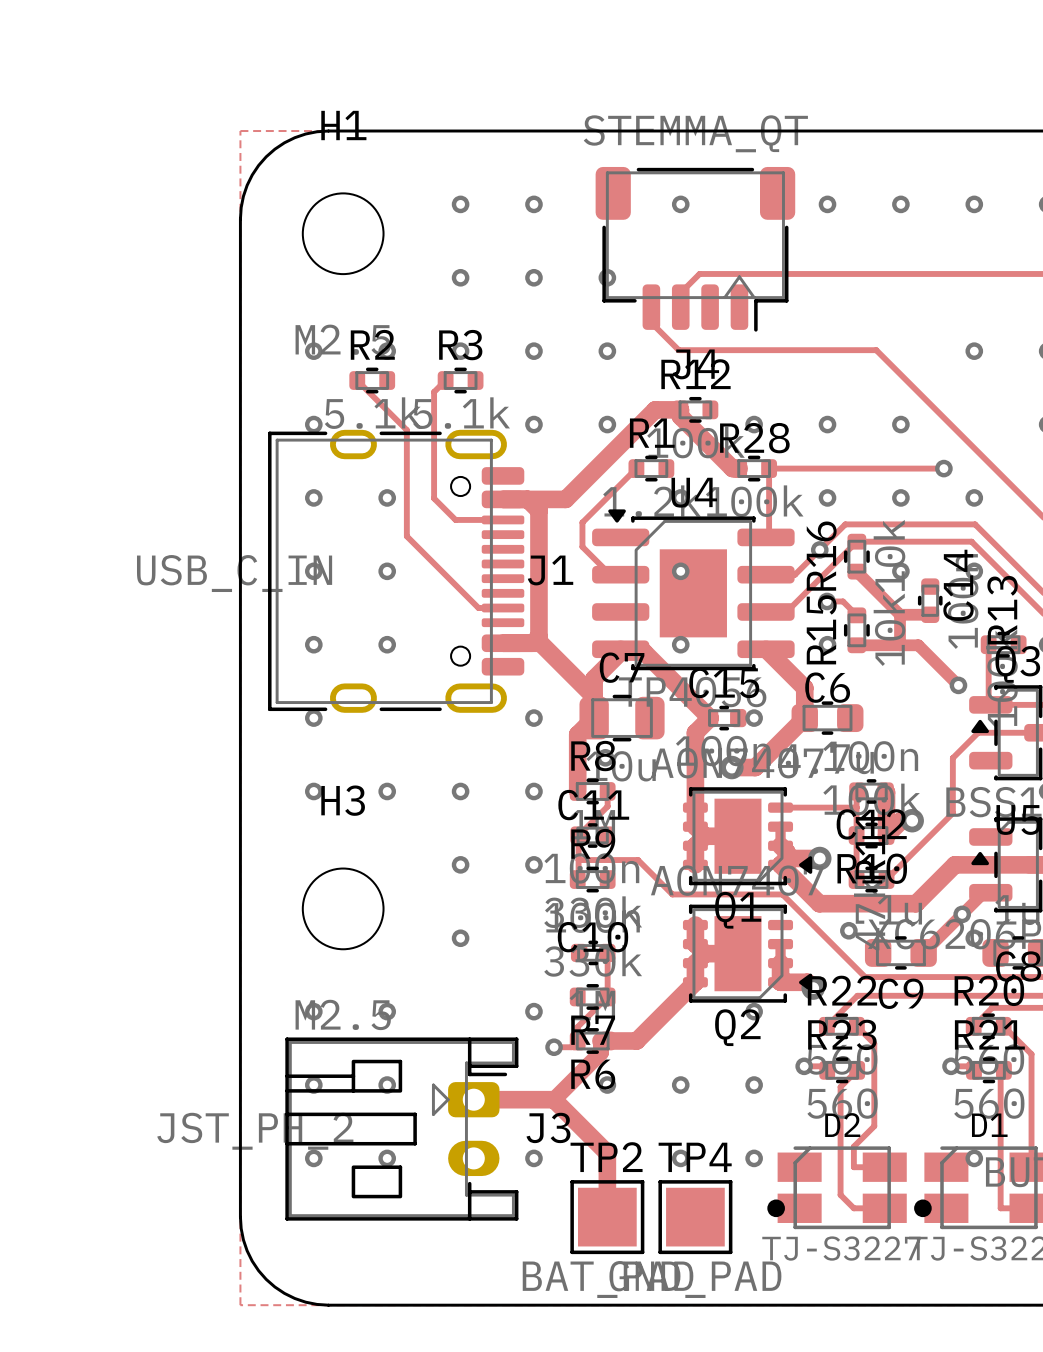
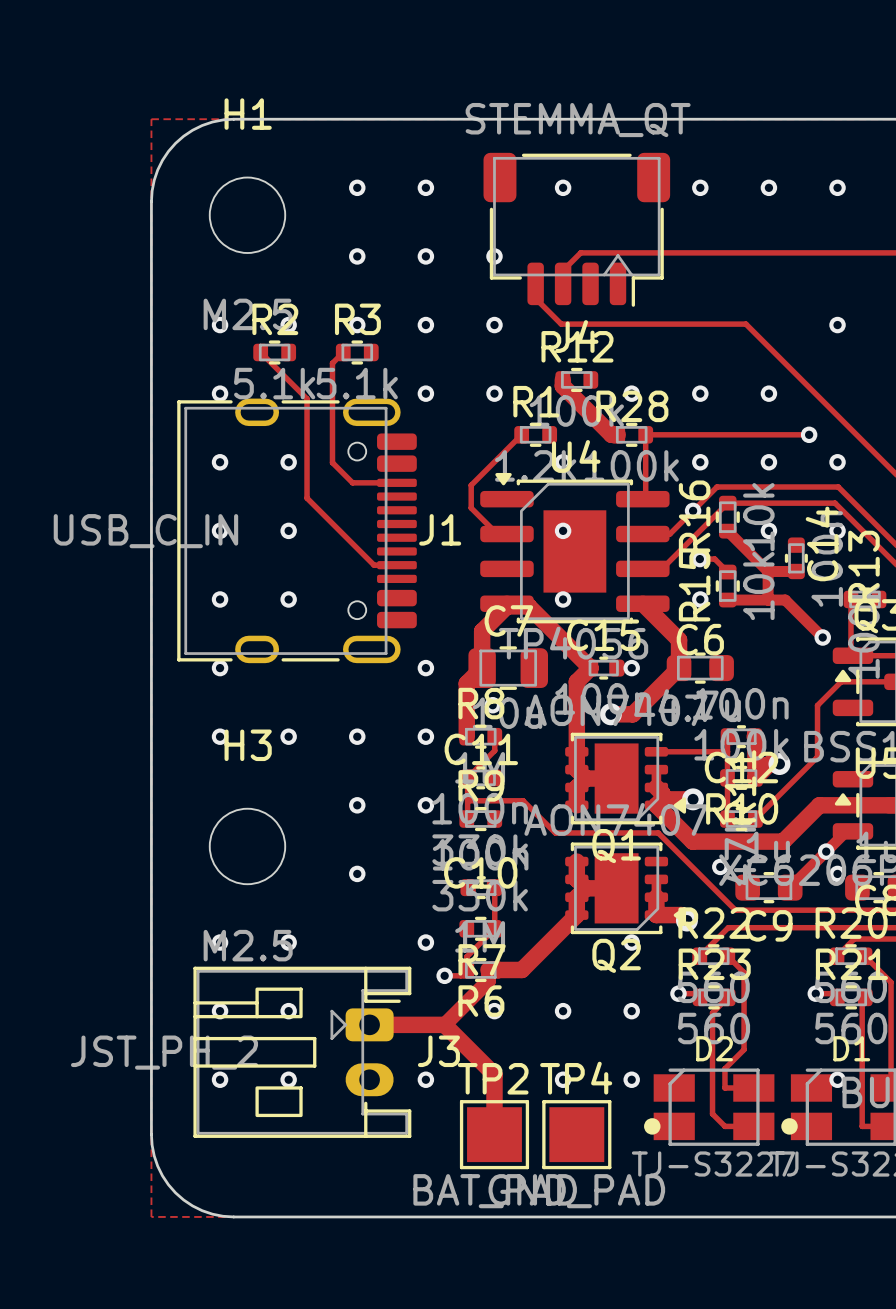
track: (680, 409) (655, 409) (565, 499) (503, 499) -> none
track: (527, 499) (538, 510) (538, 636) (532, 643) -> none
track: (503, 643) (540, 643) (594, 696) -> none

